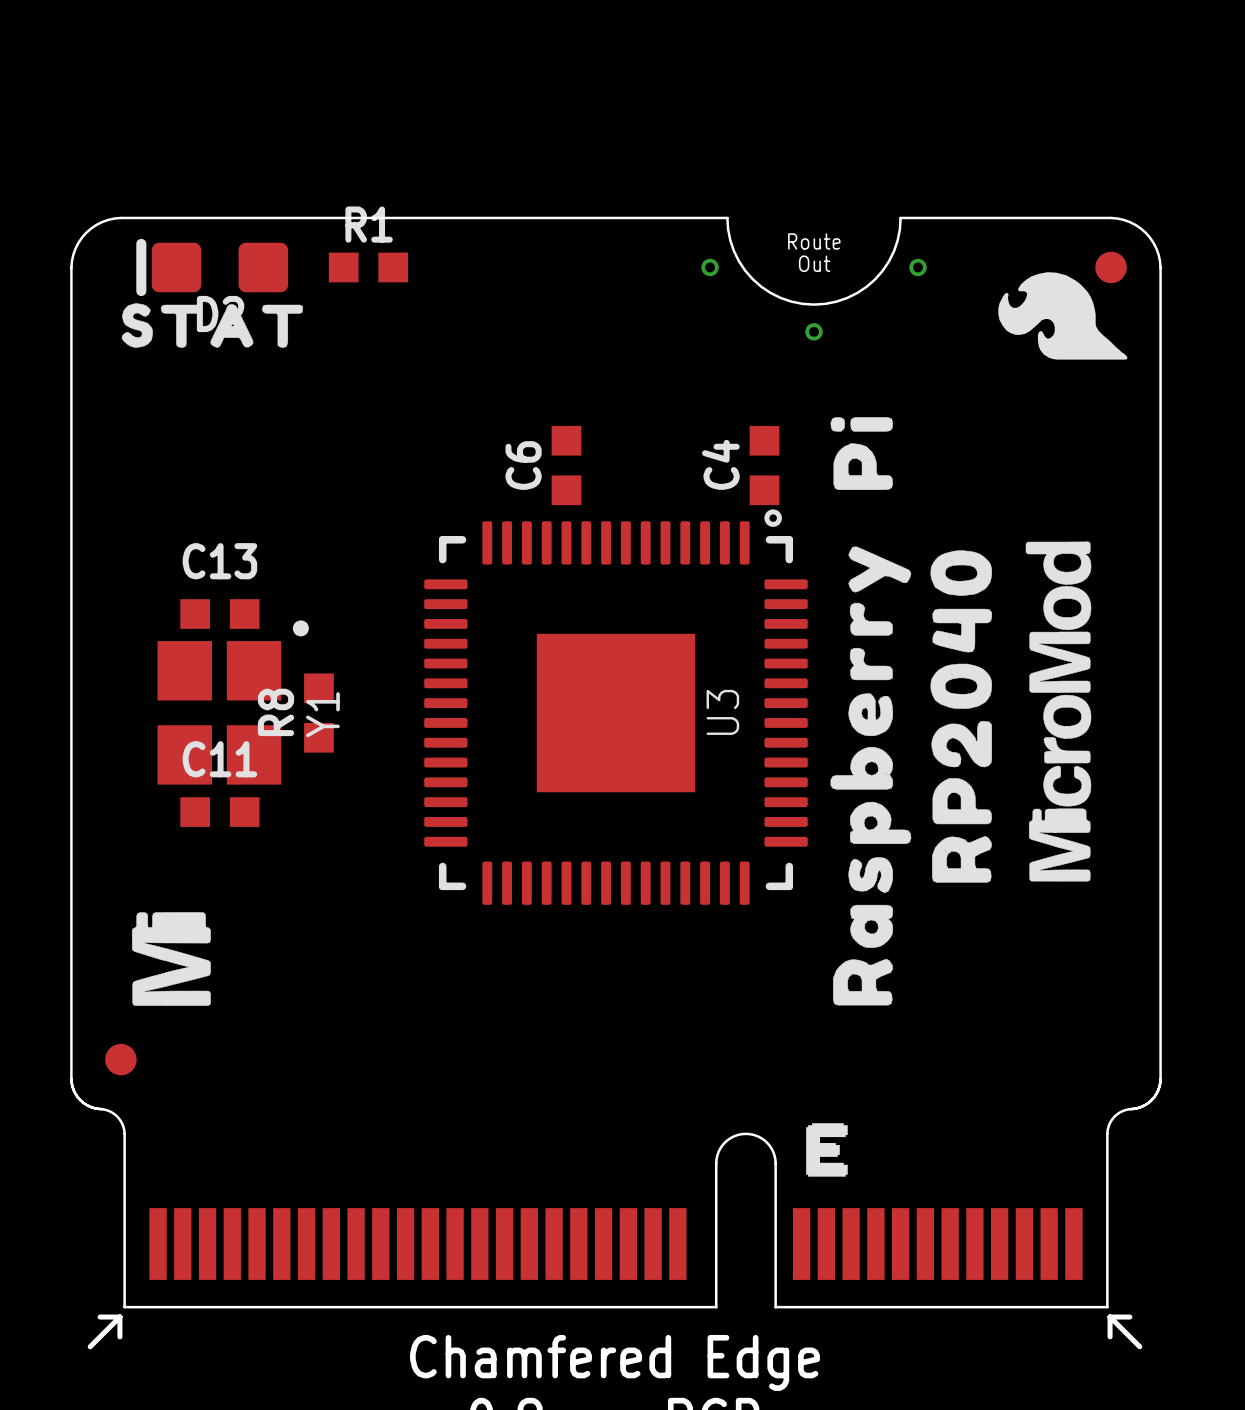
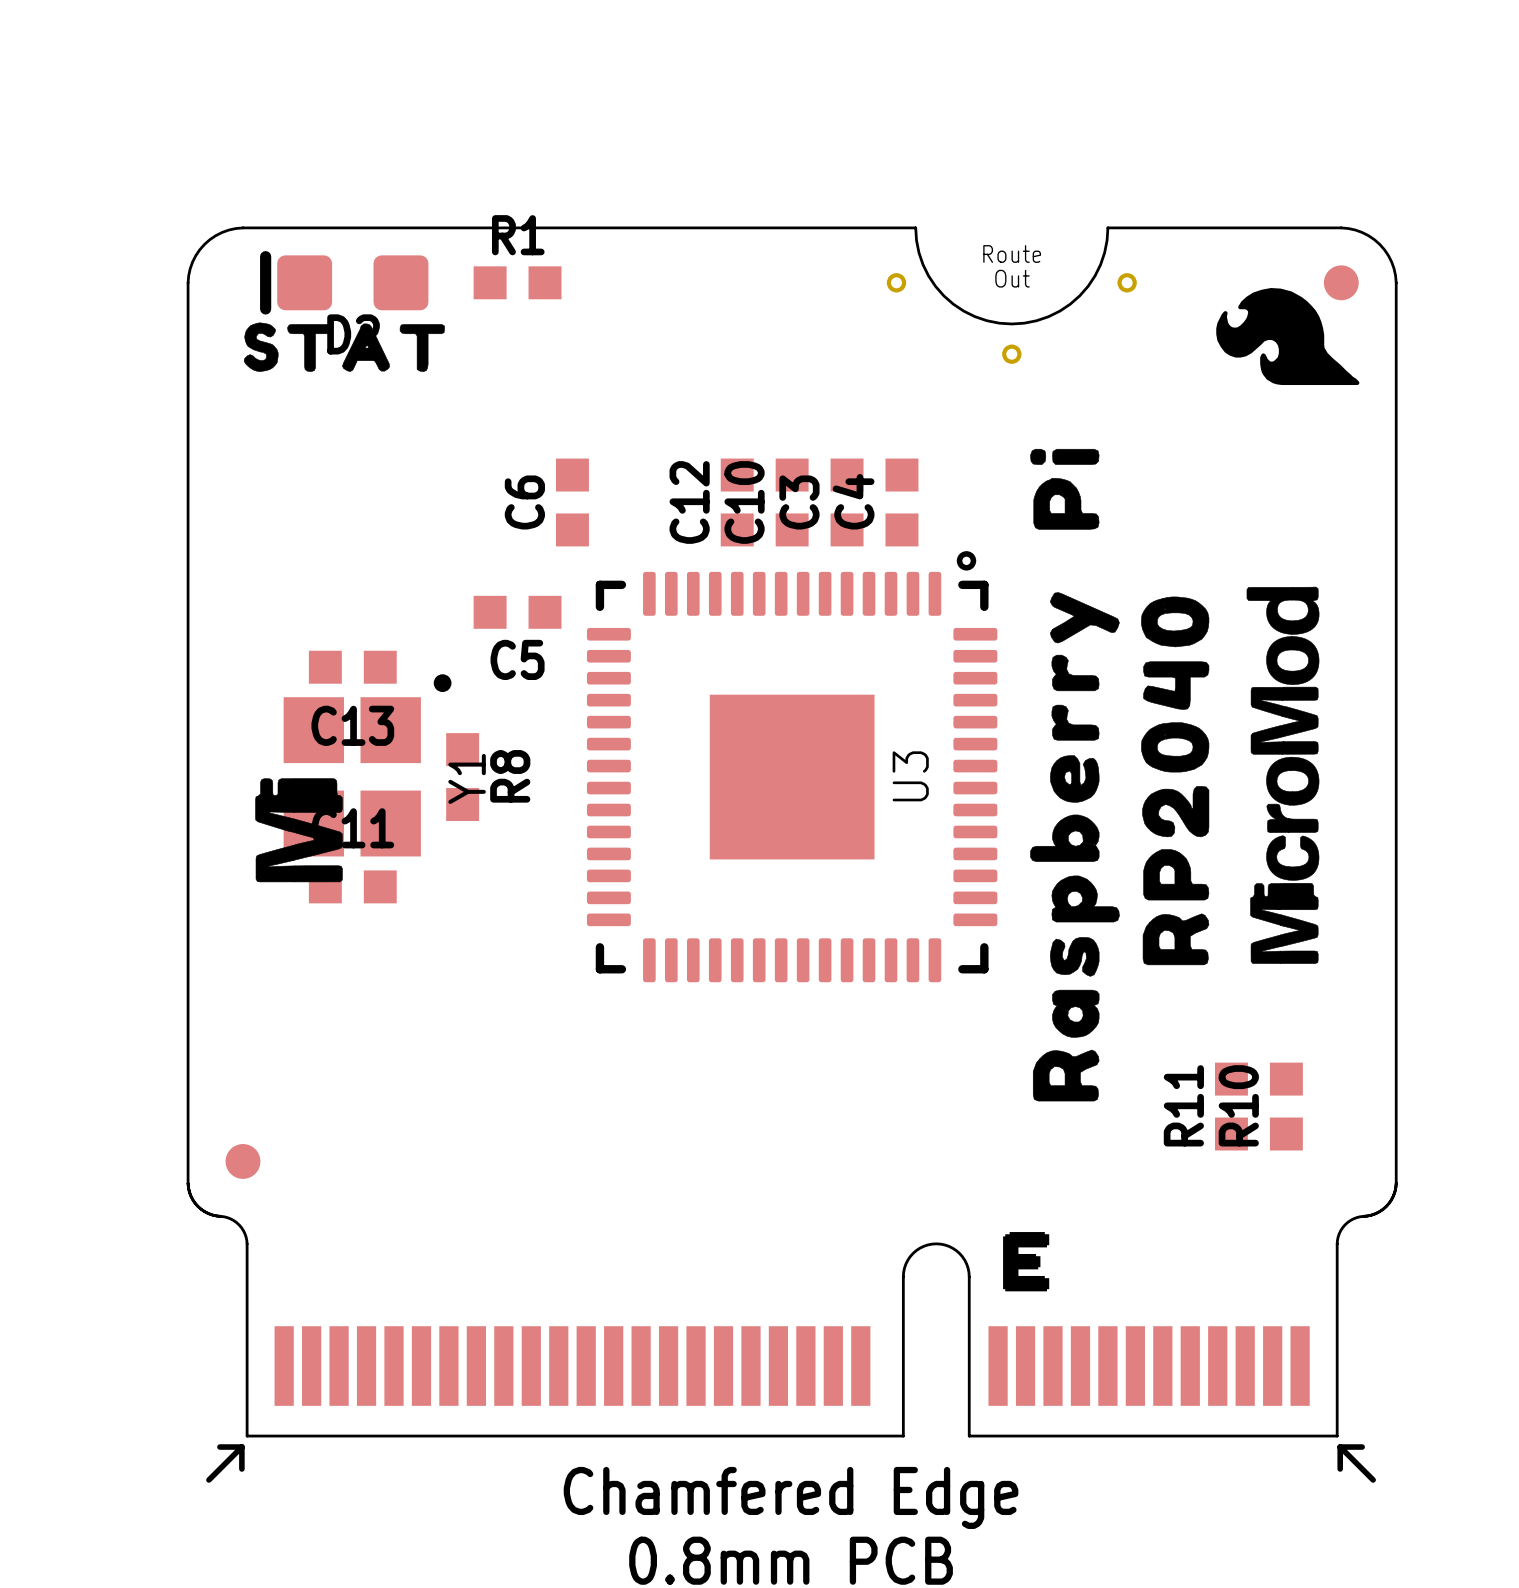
C6: none -> (572, 502)
C6 name: C6 (523, 465) -> C12 (689, 502)
C10: none -> (792, 502)
C3: none -> (847, 502)
C4 position: (764, 465) -> (901, 502)
U3 footprint: [424, 509, 808, 905] -> [586, 551, 998, 983]
C13 name position: C13 (219, 561) -> C13 (352, 725)
C5: none -> (517, 612)
R8 name position: R8 (276, 712) -> R8 (510, 776)
drawing position: (171, 959) -> (298, 830)
R11: none -> (1231, 1106)
R10: none -> (1286, 1106)

